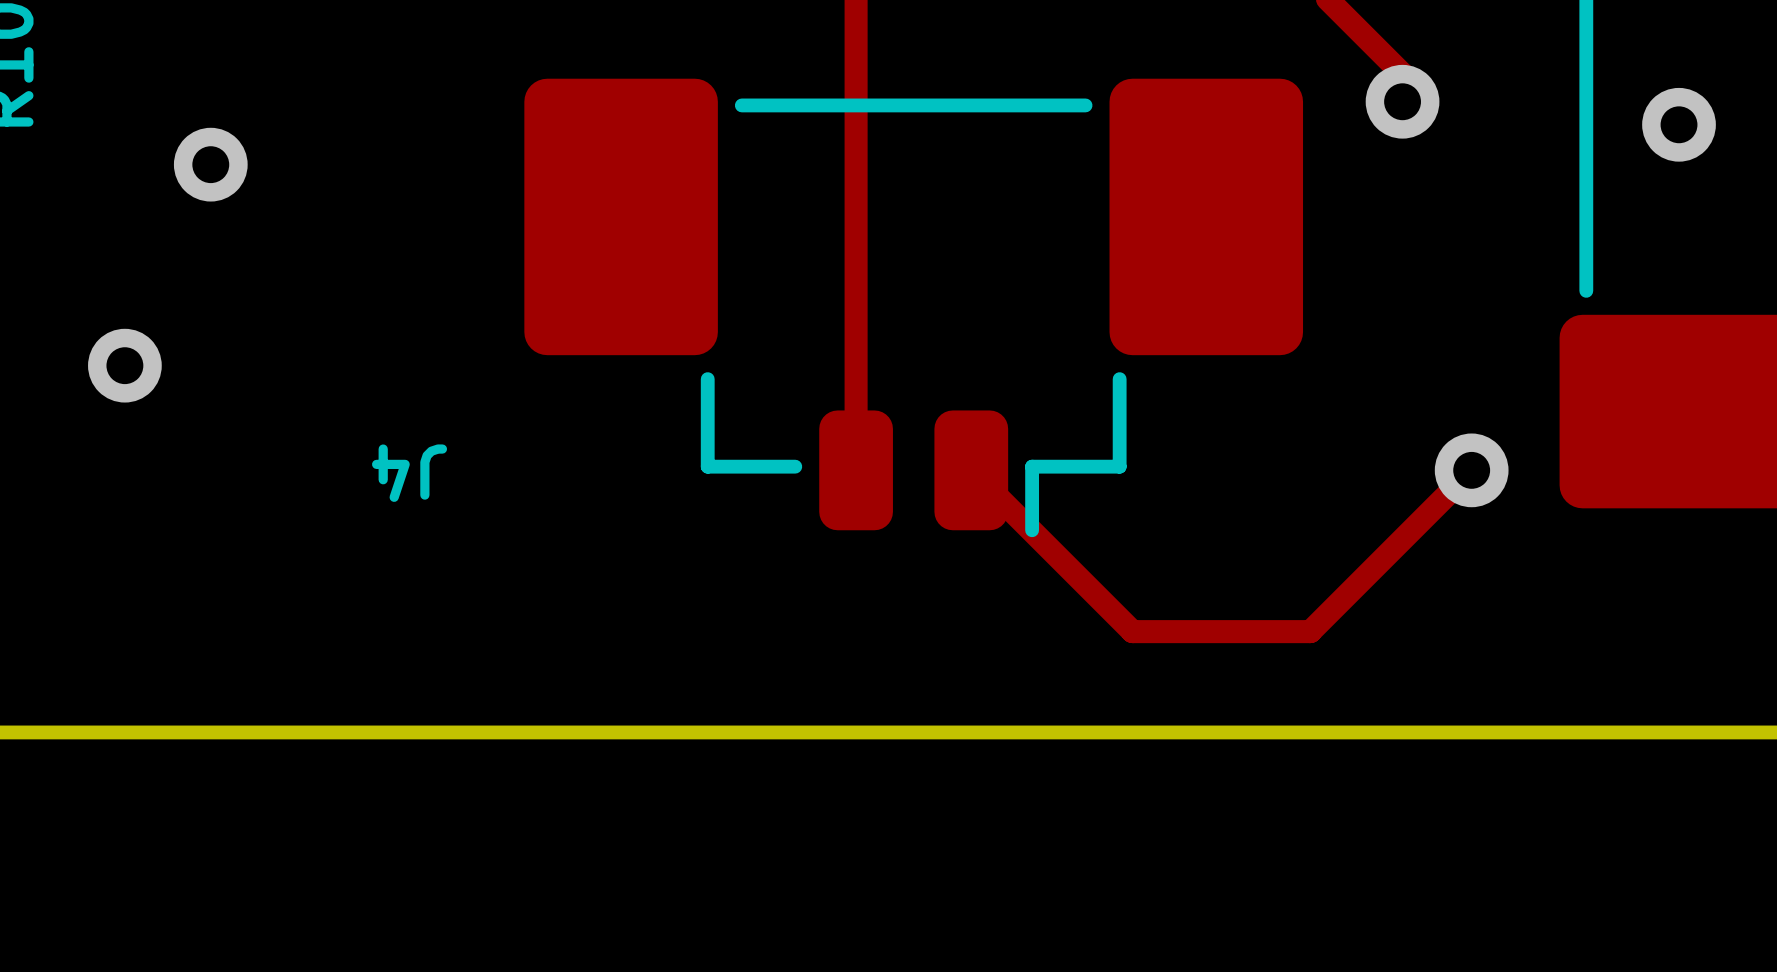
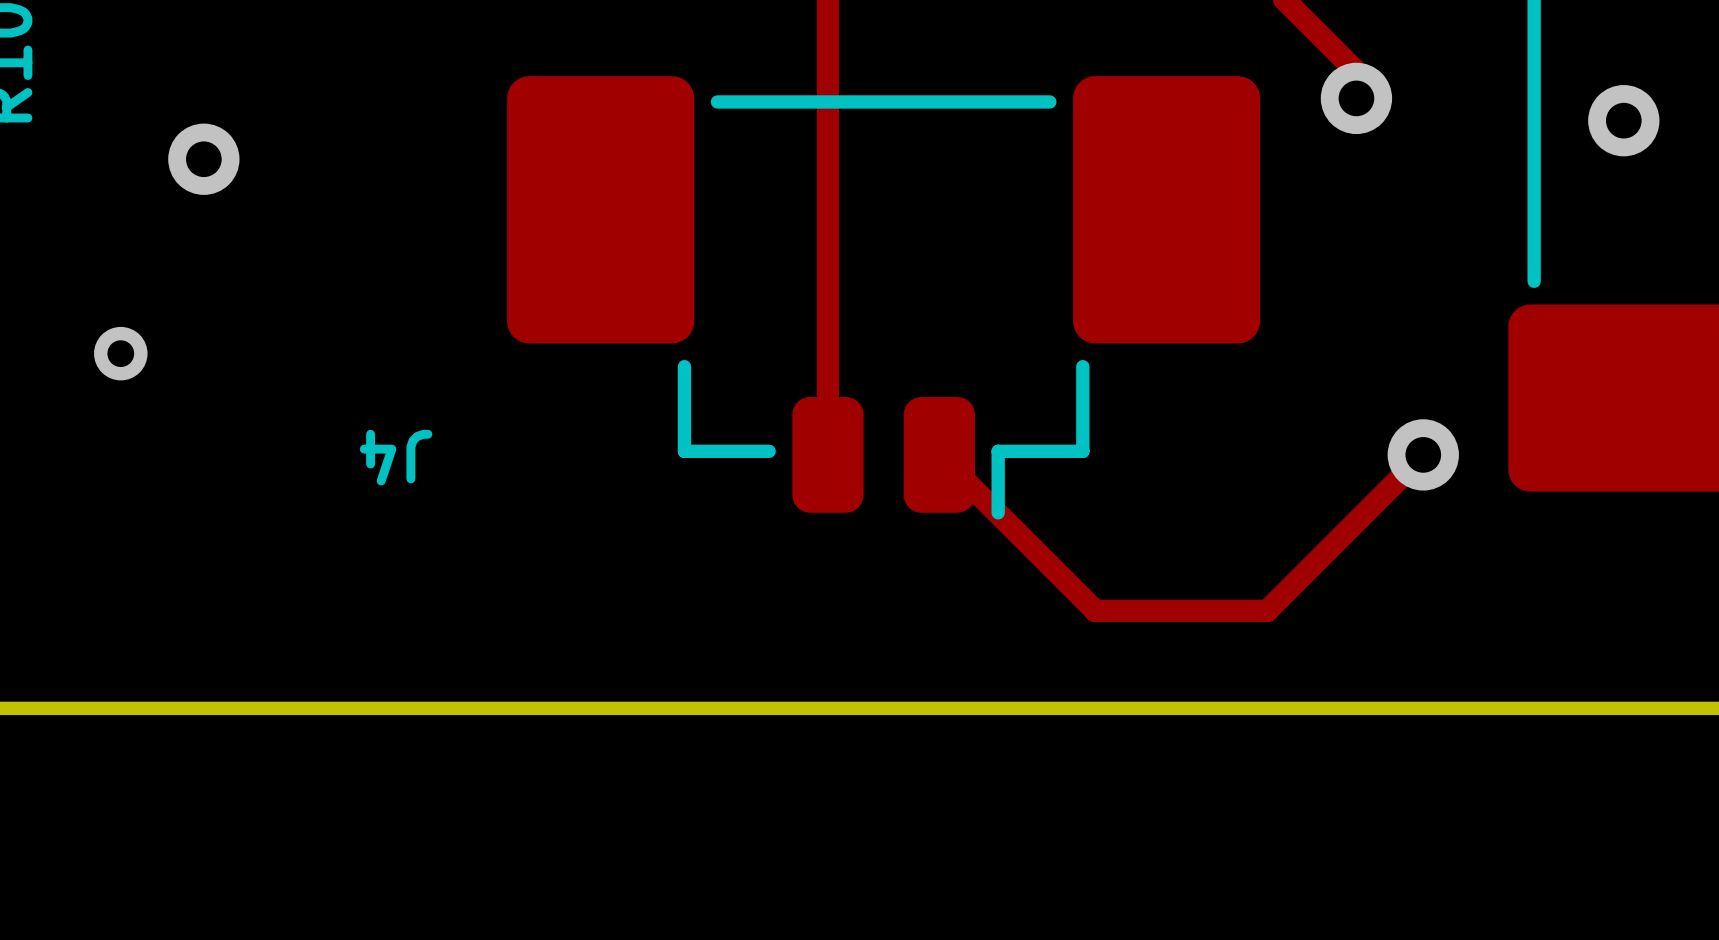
via size: [88, 328, 162, 403] -> [94, 326, 148, 381]

